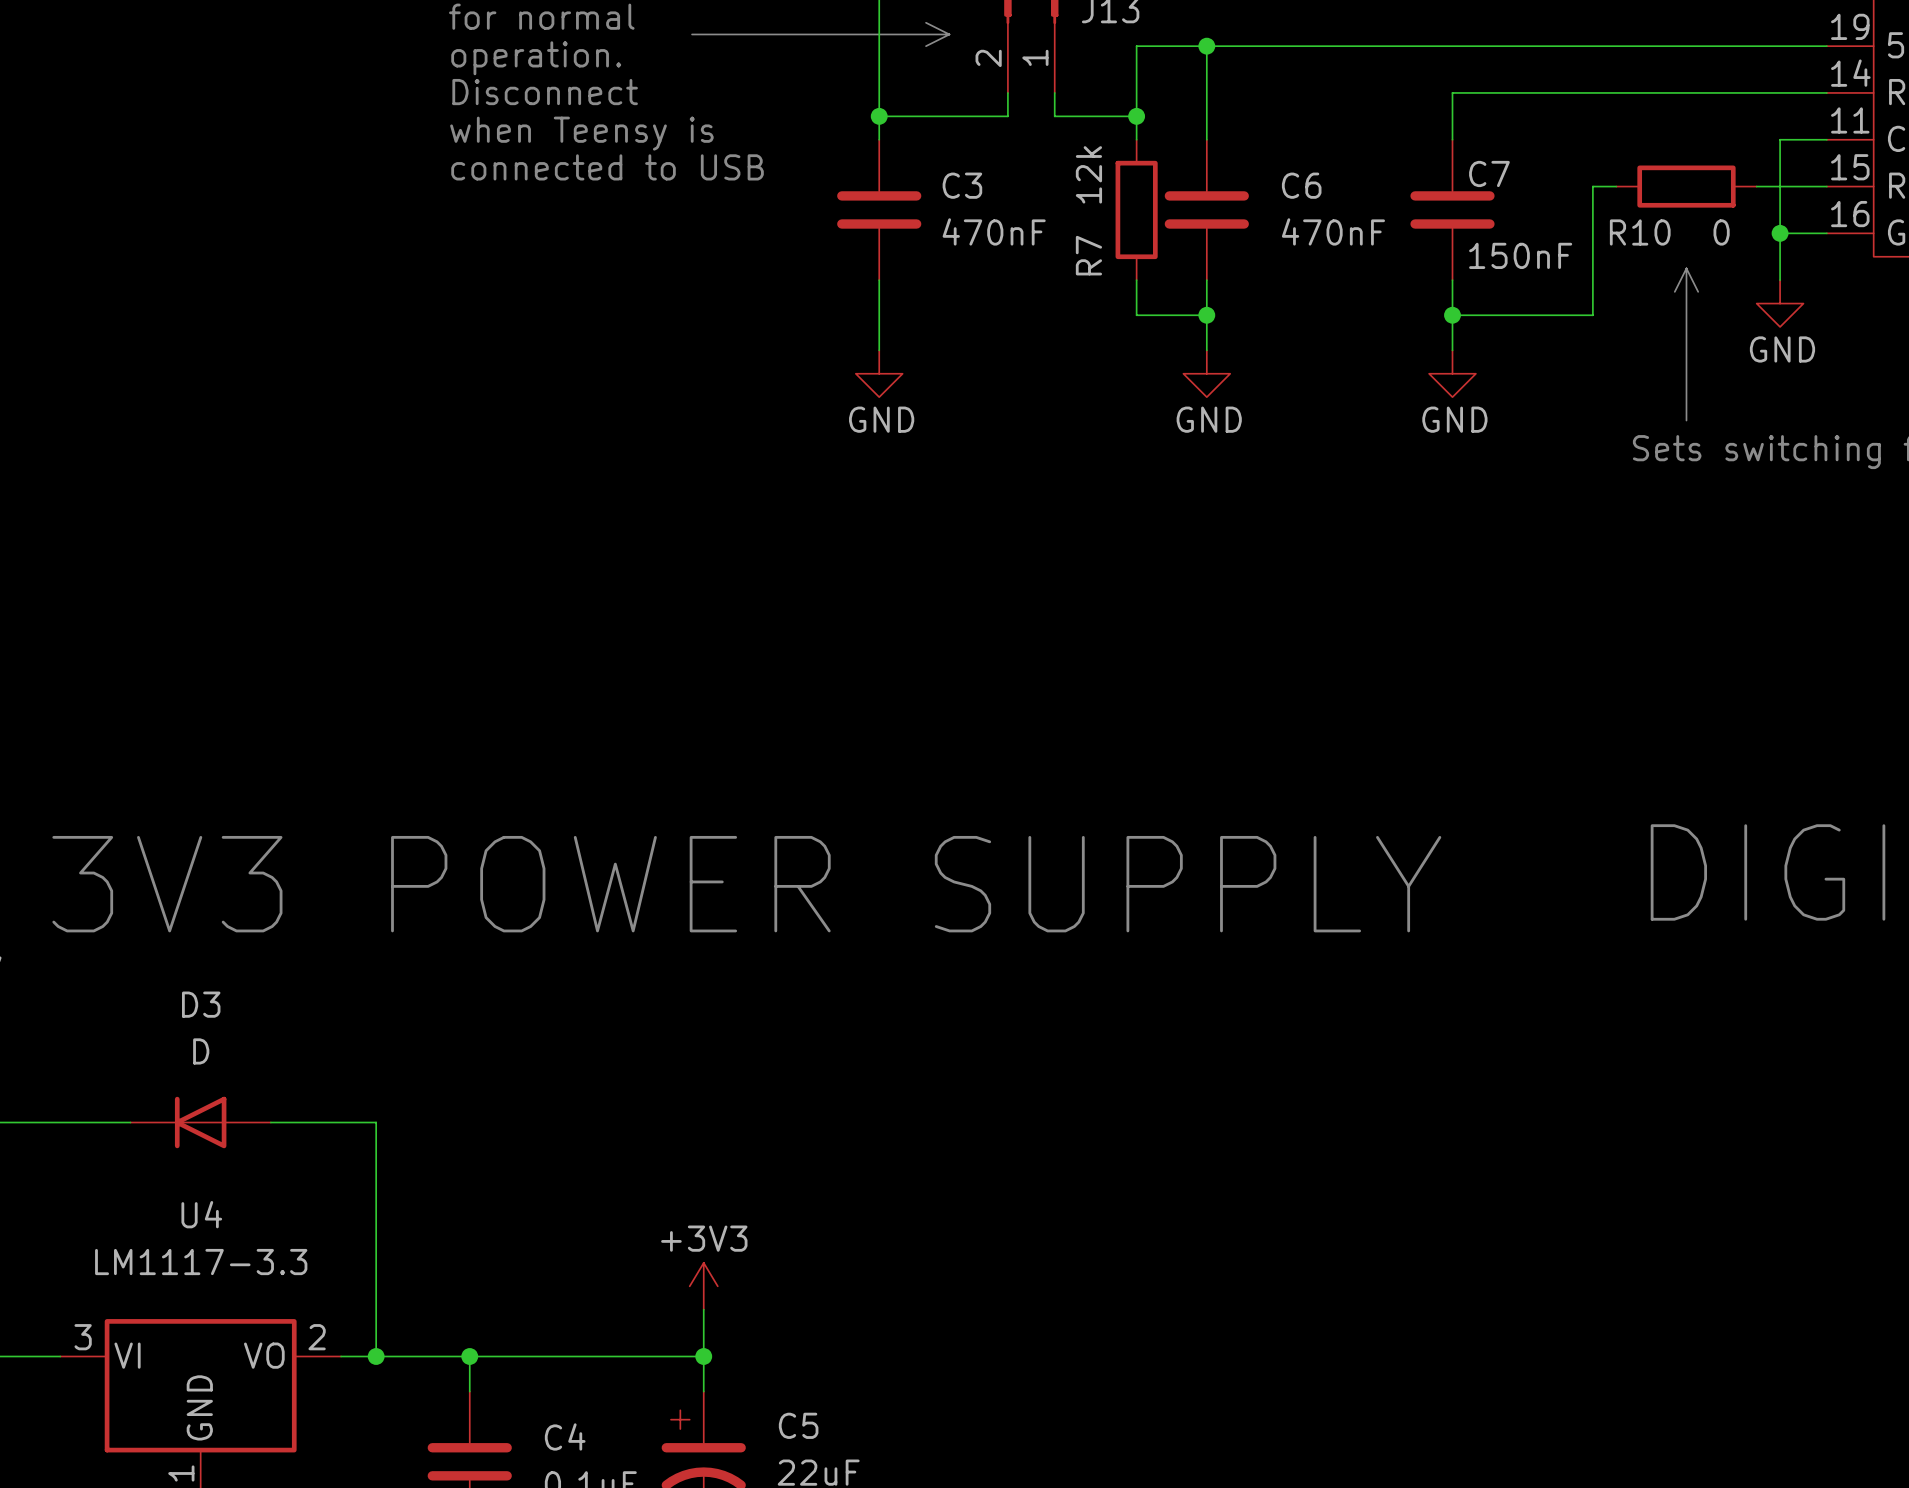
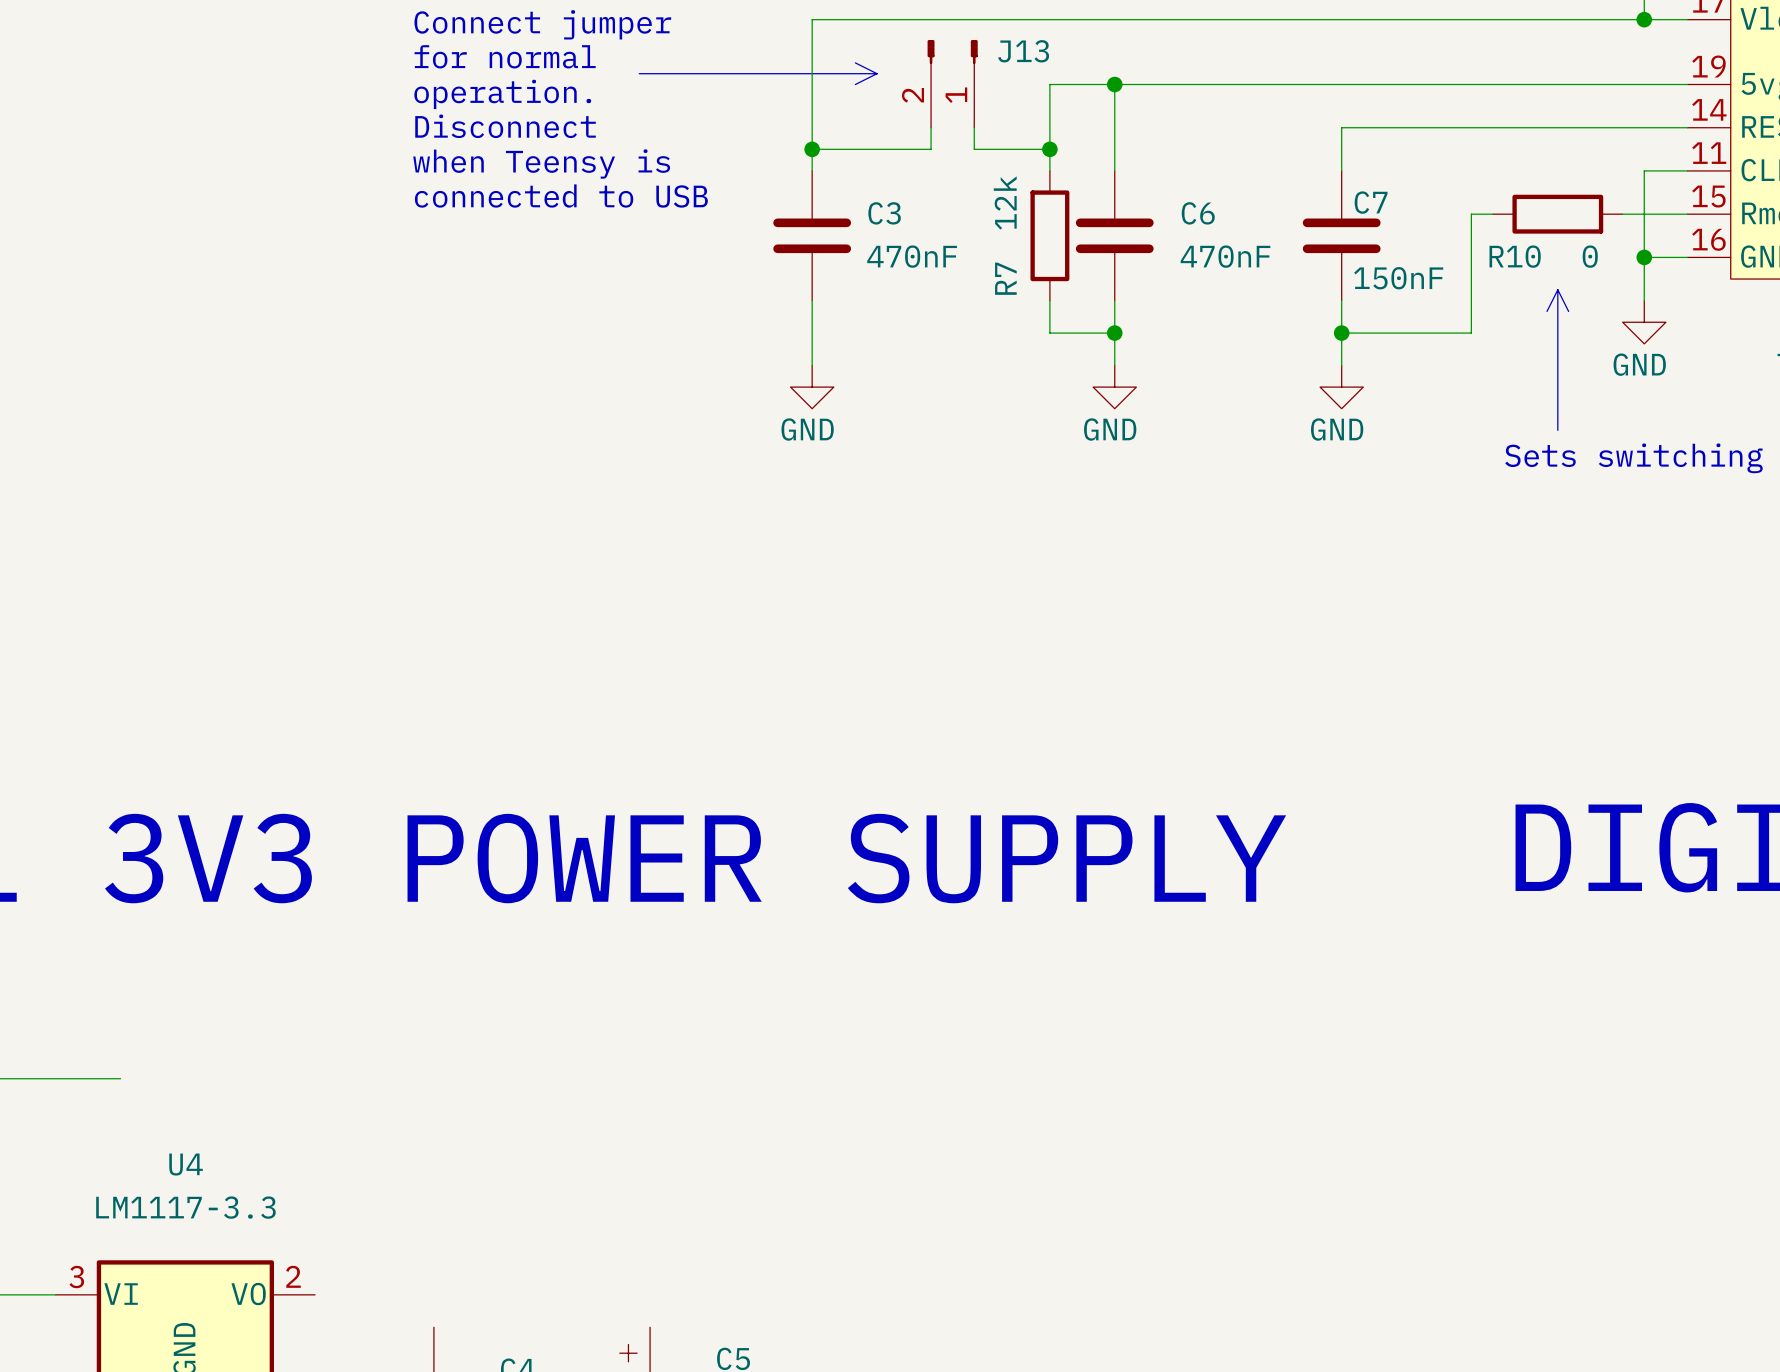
D3: D (200, 1122) -> none
wire: (270, 1122) (376, 1122) (376, 1356) -> none
power symbol: +3V3 (703, 1286) -> none
wire: (703, 1309) (703, 1391) -> none
wire: (341, 1356) (703, 1356) -> none
junction: (376, 1356) -> none
wire: (469, 1356) (469, 1391) -> none
junction: (469, 1356) -> none
junction: (703, 1356) -> none

